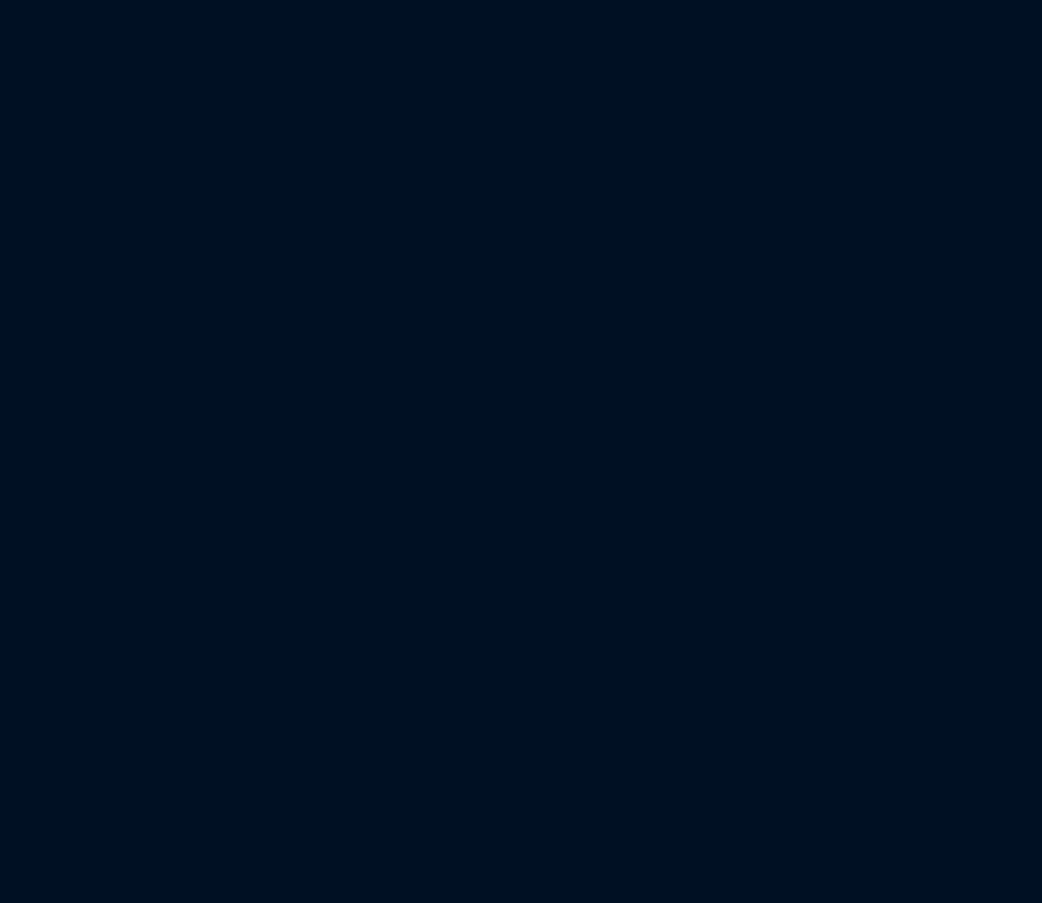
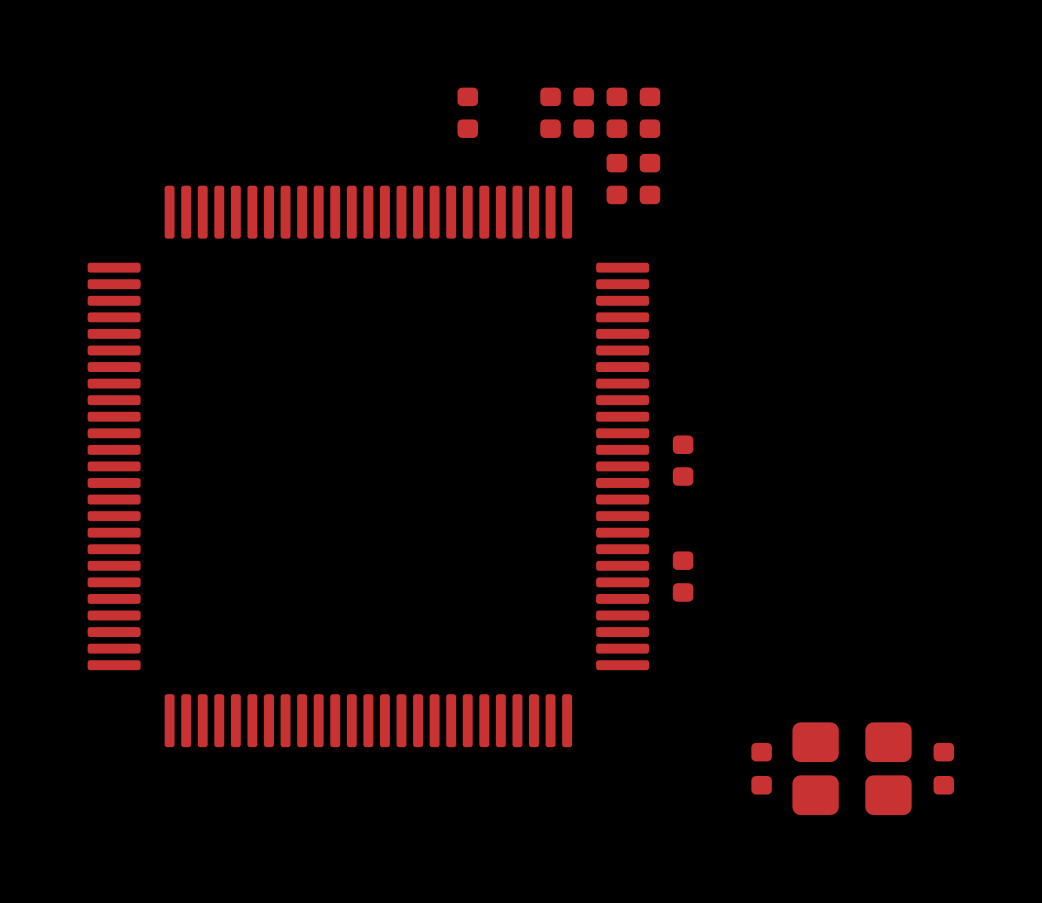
part: none -> (467, 112)
part: none -> (550, 112)
part: none -> (583, 112)
part: none -> (616, 112)
part: none -> (649, 112)
part: none -> (616, 179)
part: none -> (649, 179)
part: none -> (683, 460)
part: none -> (368, 466)
part: none -> (683, 576)
part: none -> (761, 768)
part: none -> (852, 768)
part: none -> (943, 768)

